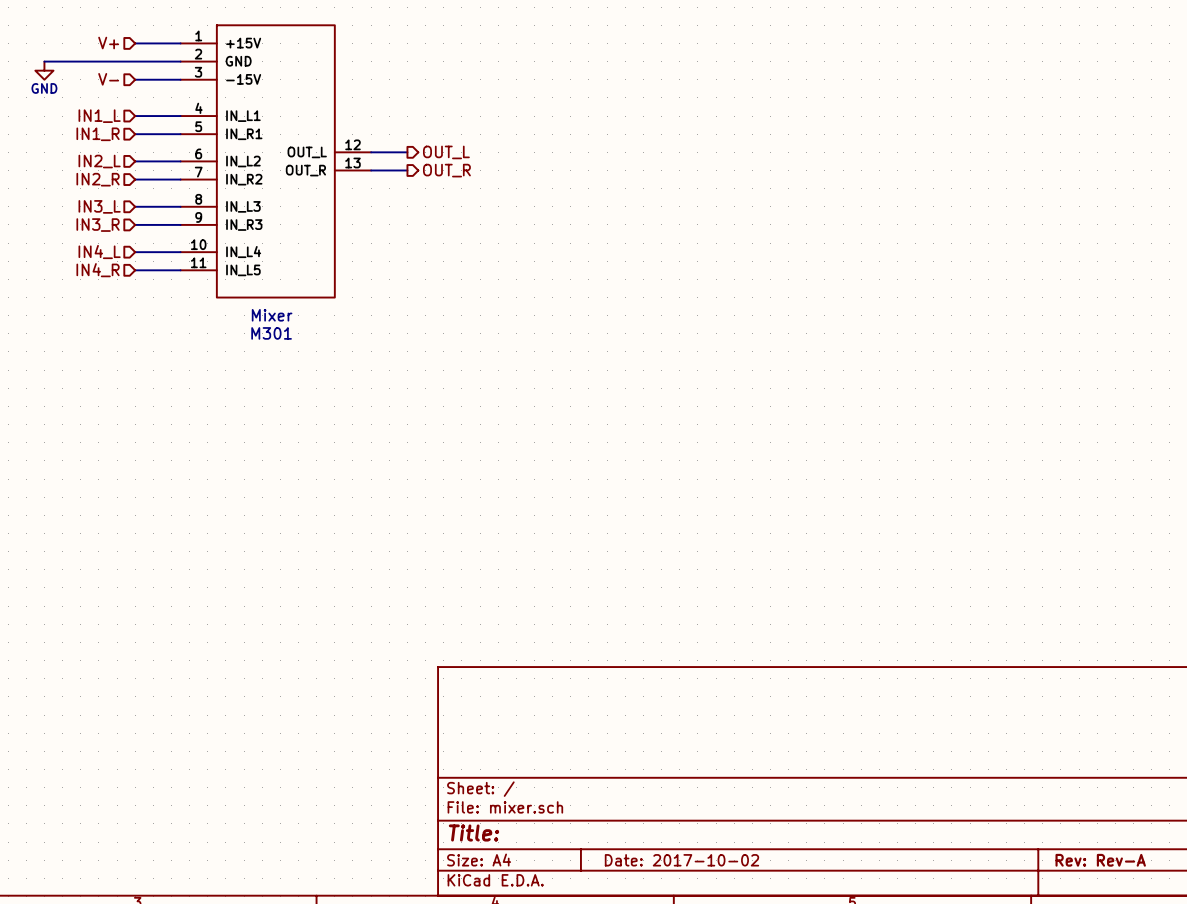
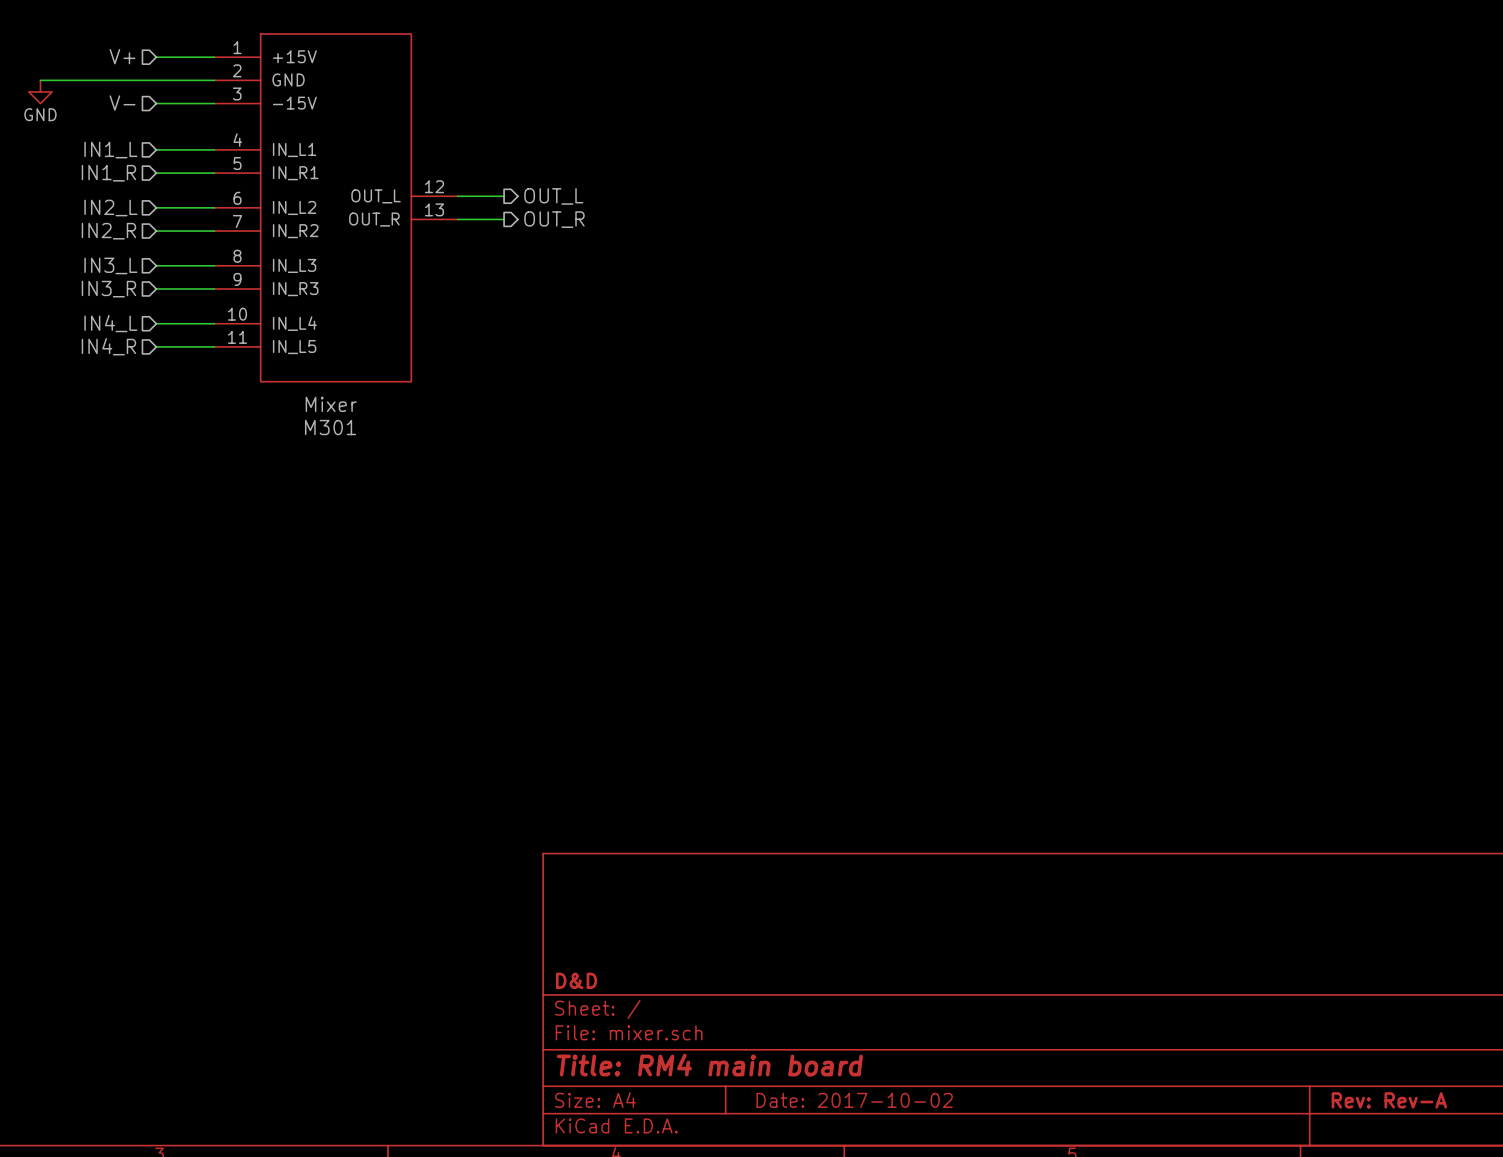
title block: none -> D&D (576, 980)
title block: Title: (473, 832) -> Title: RM4 main board (709, 1065)

